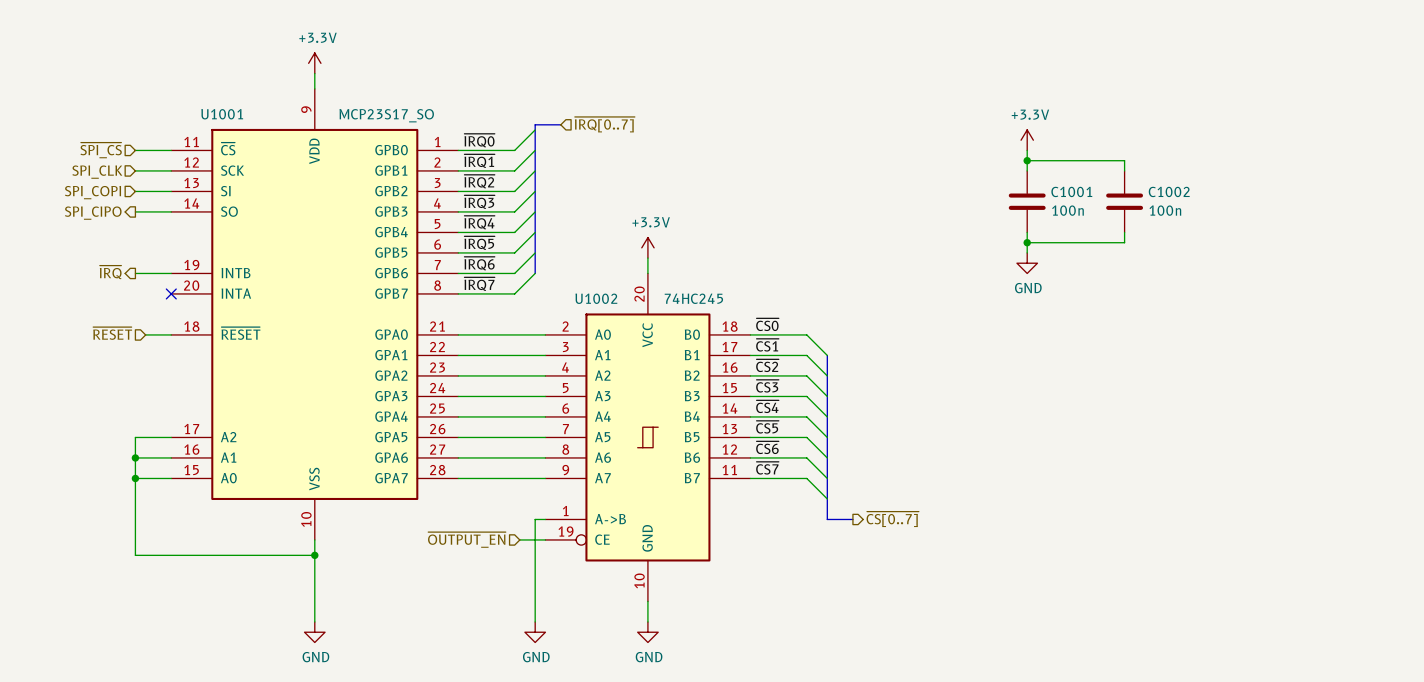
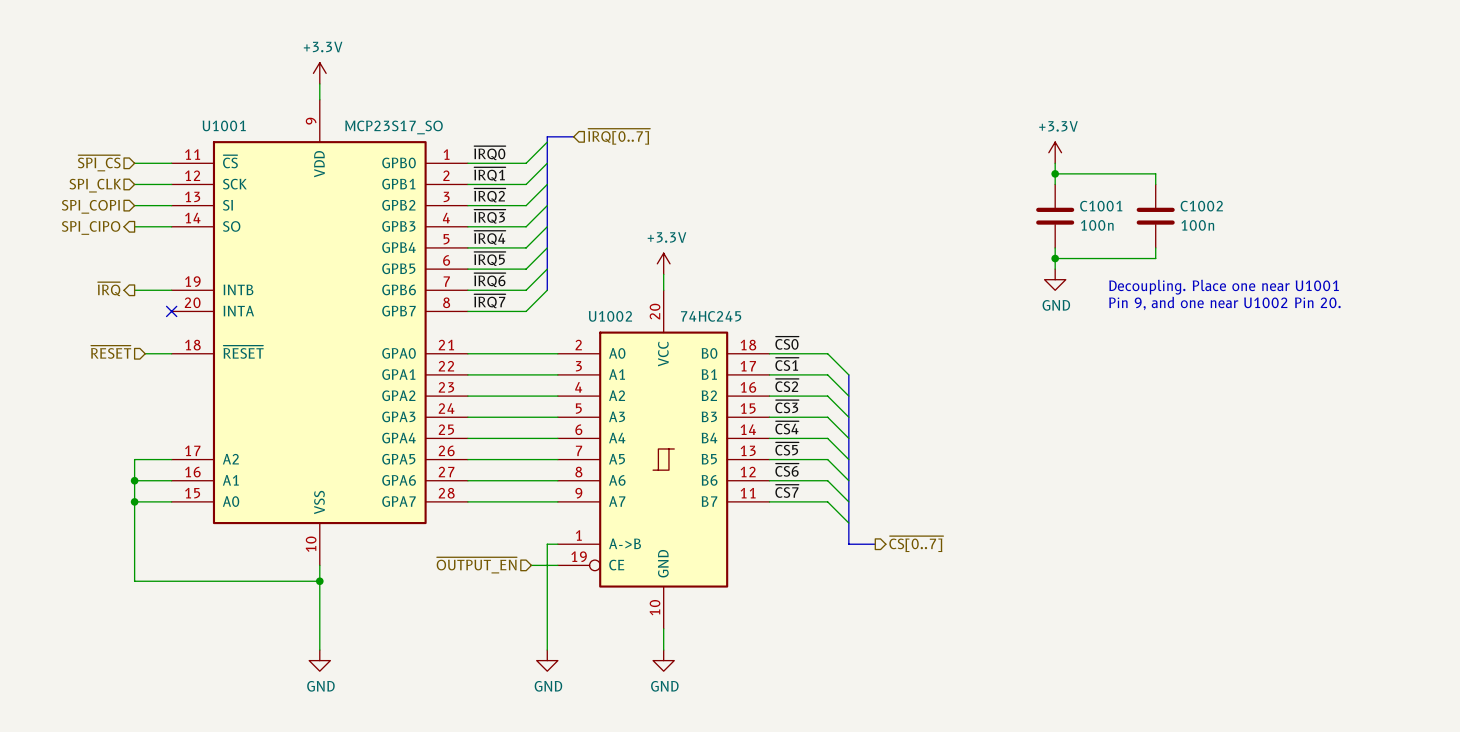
text: none -> Decoupling. Place one near U1001 (1224, 287)
text: none -> Pin 9, and one near U1002 Pin 20. (1224, 303)

